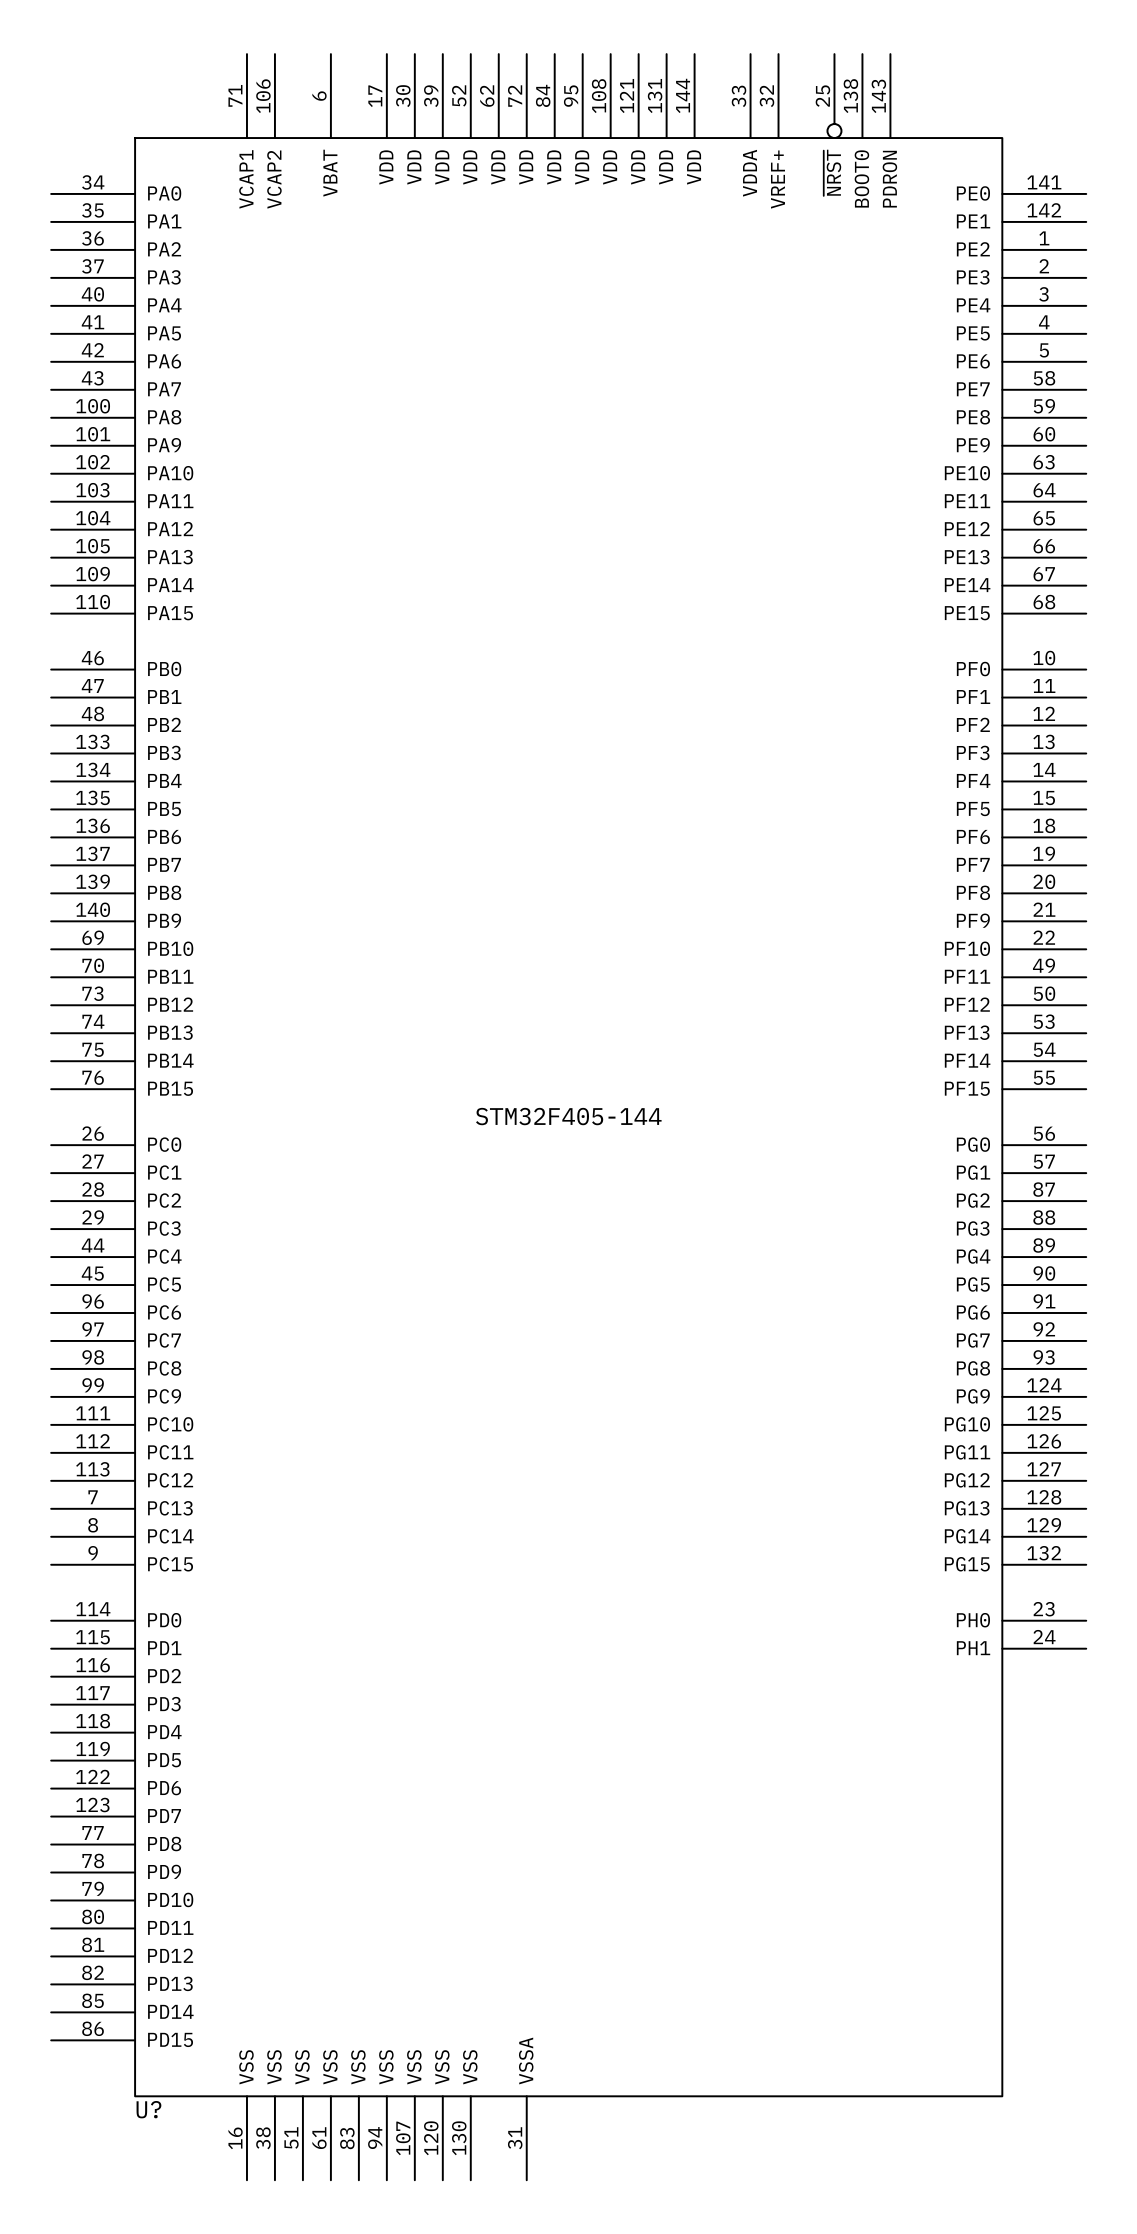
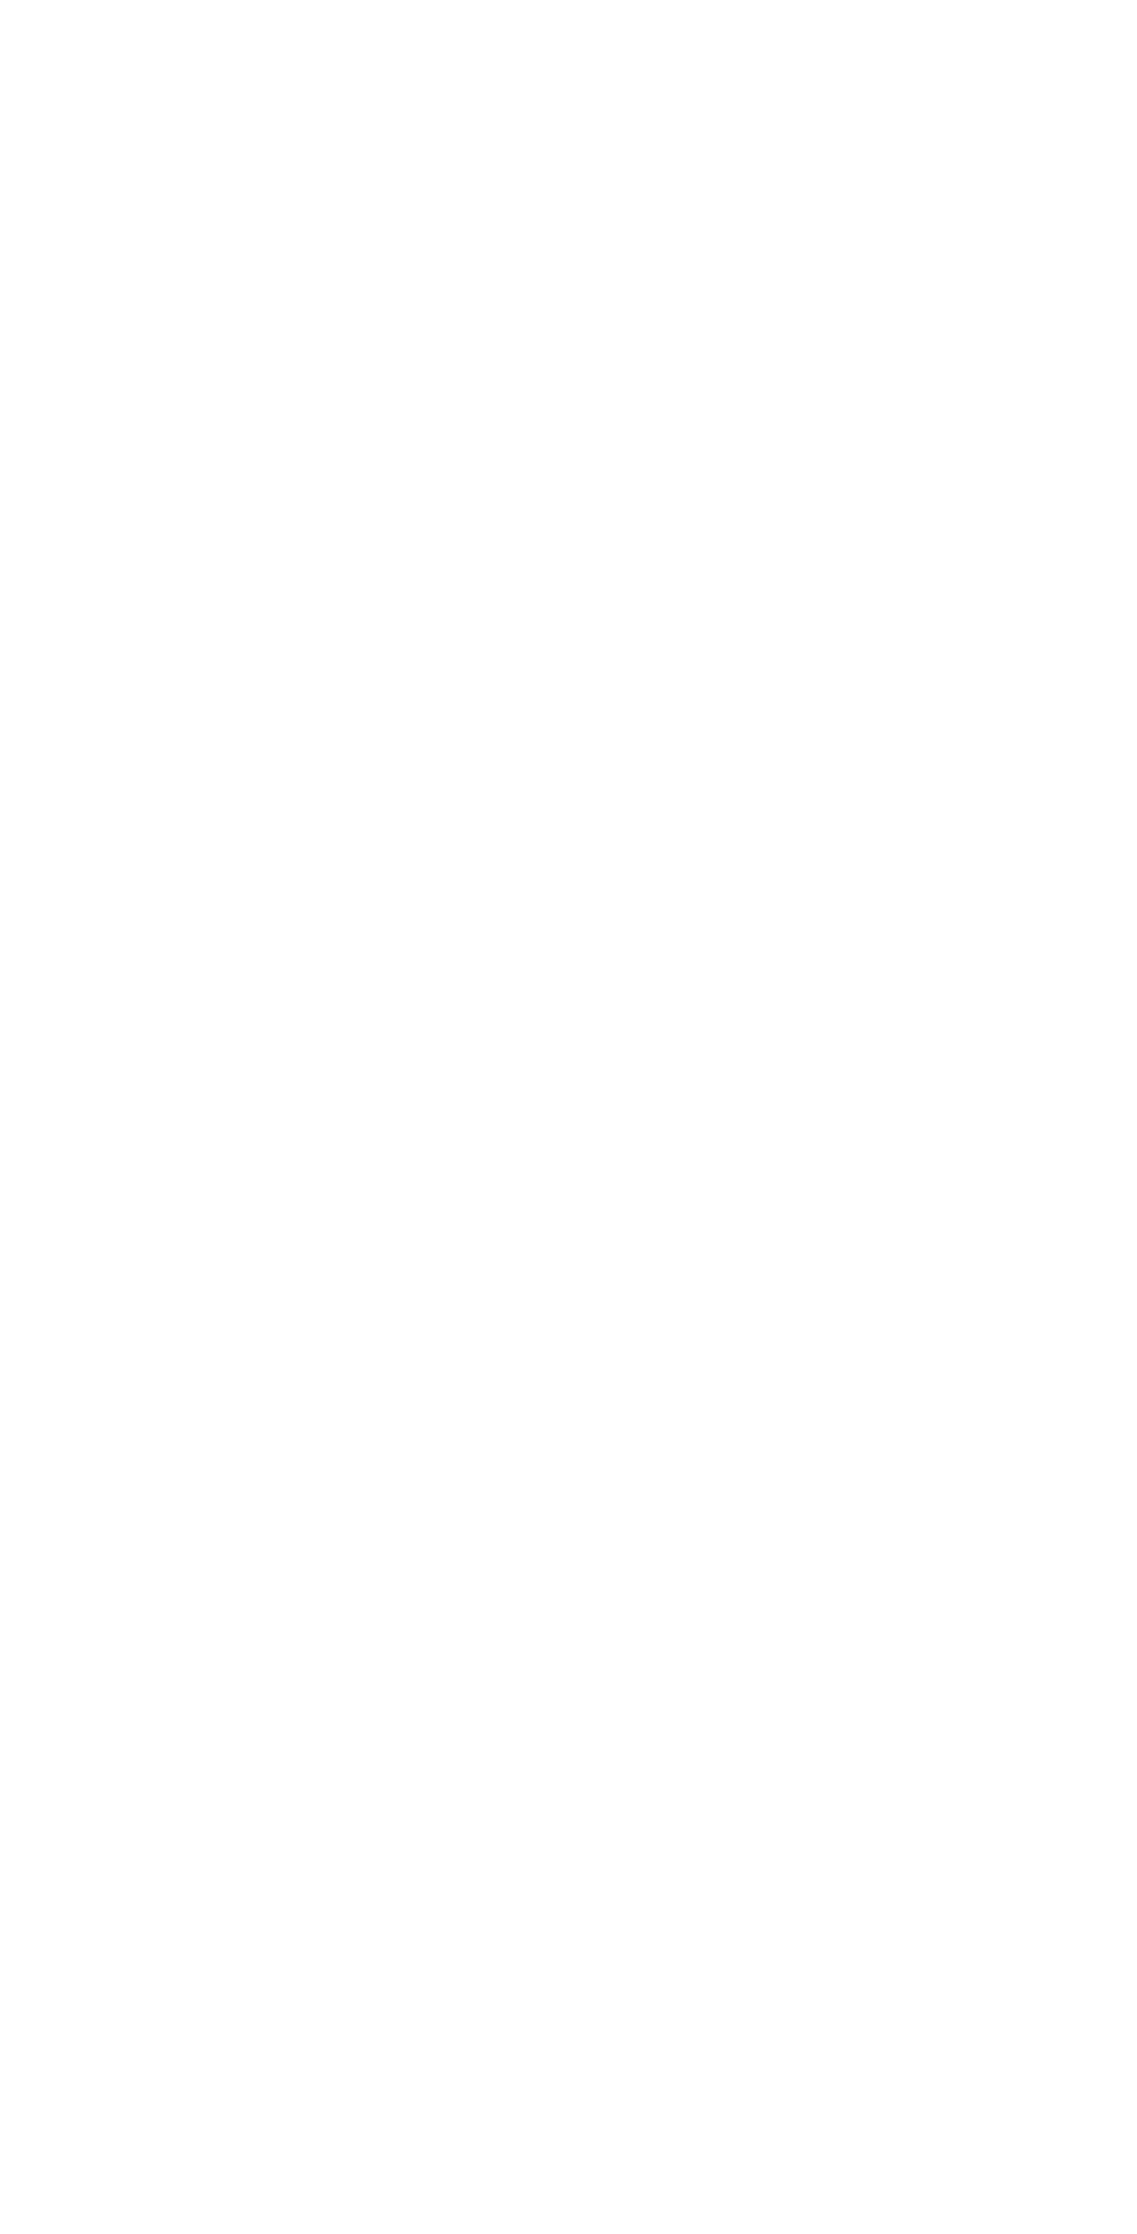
U?: STM32F405-144 (568, 1117) -> none

